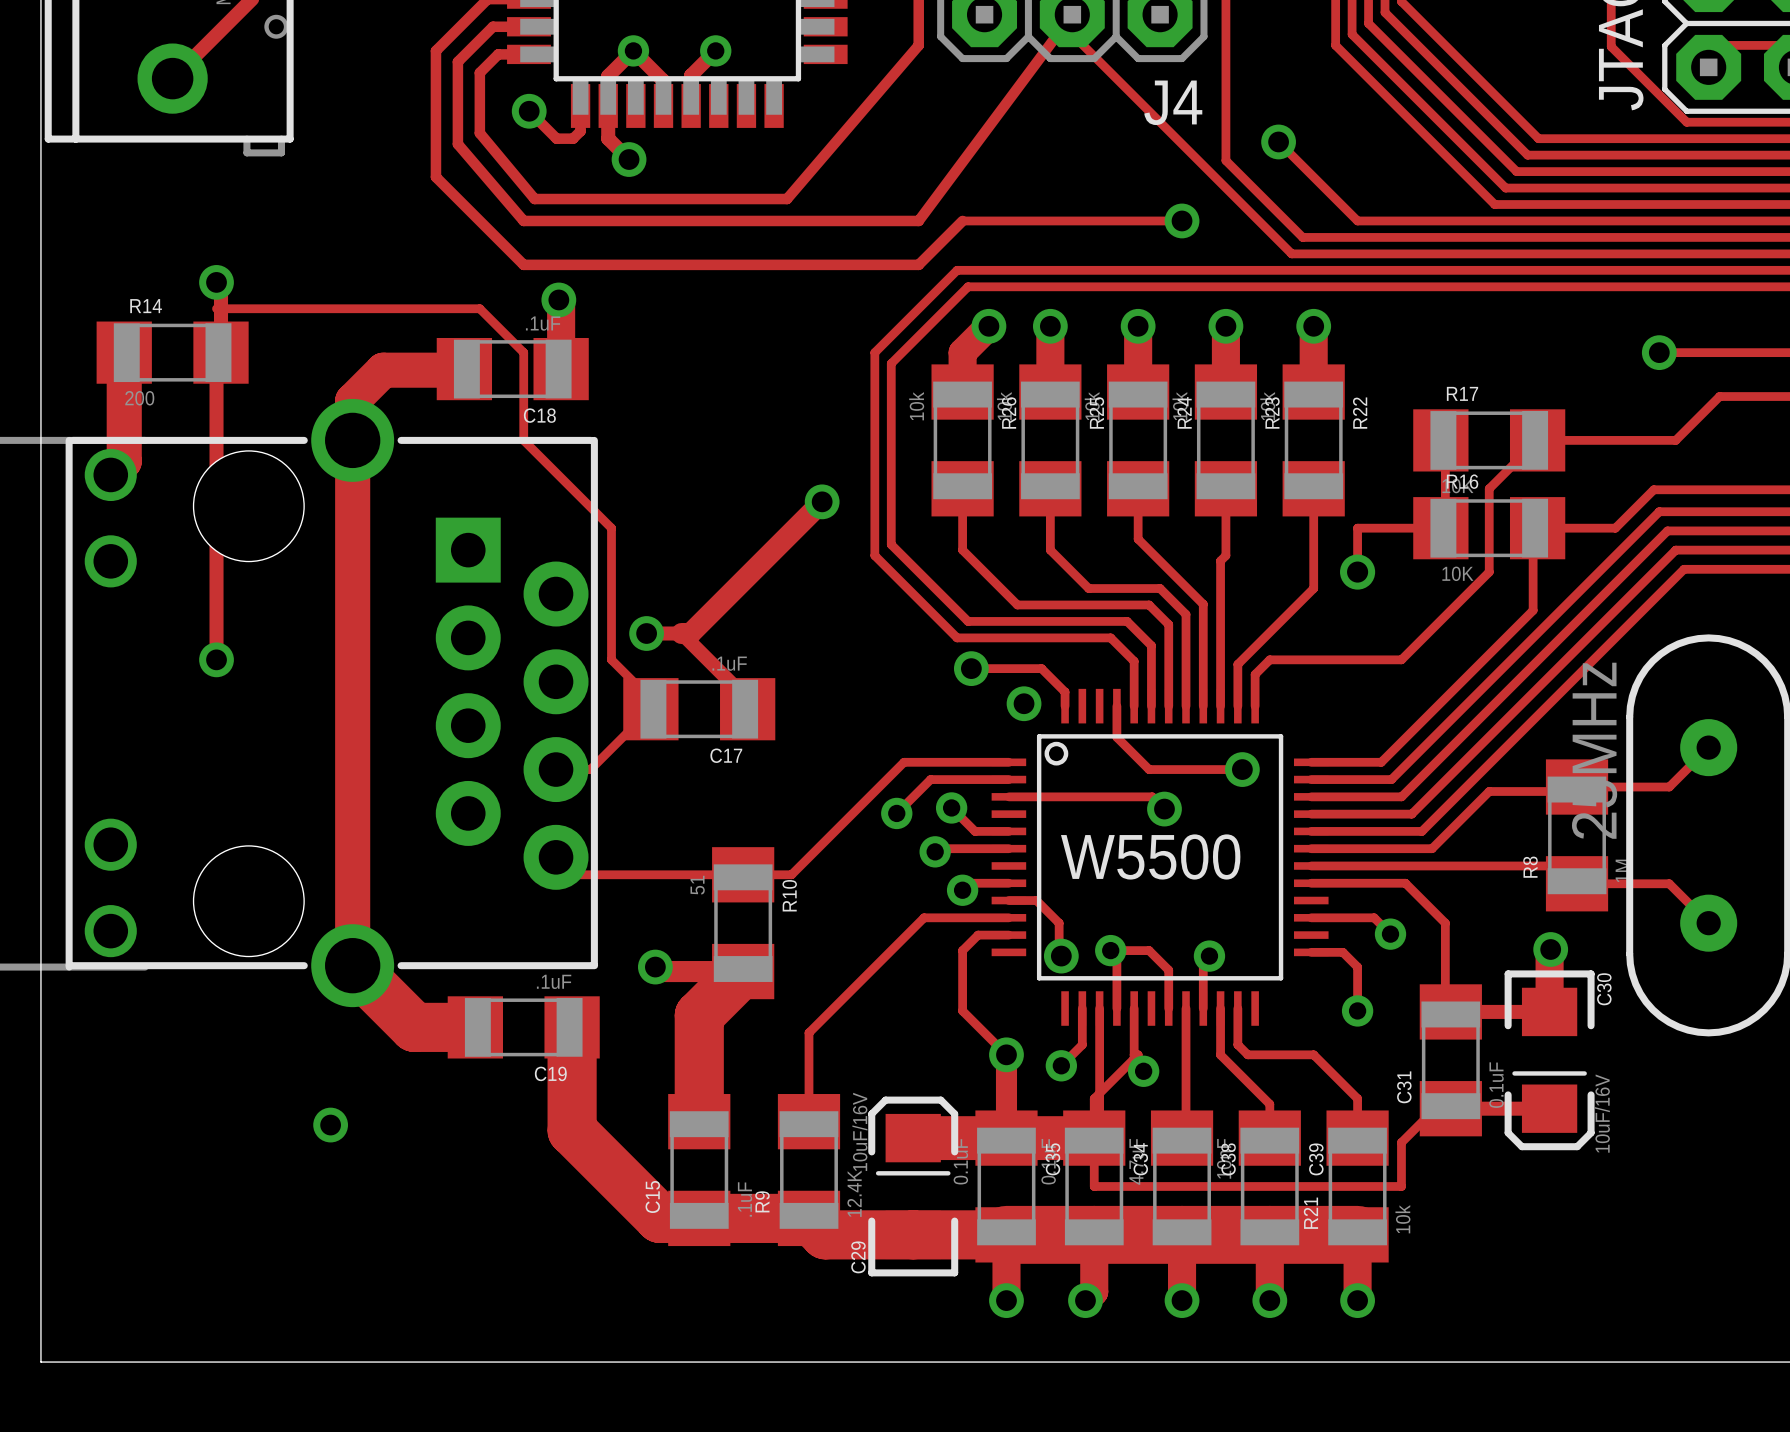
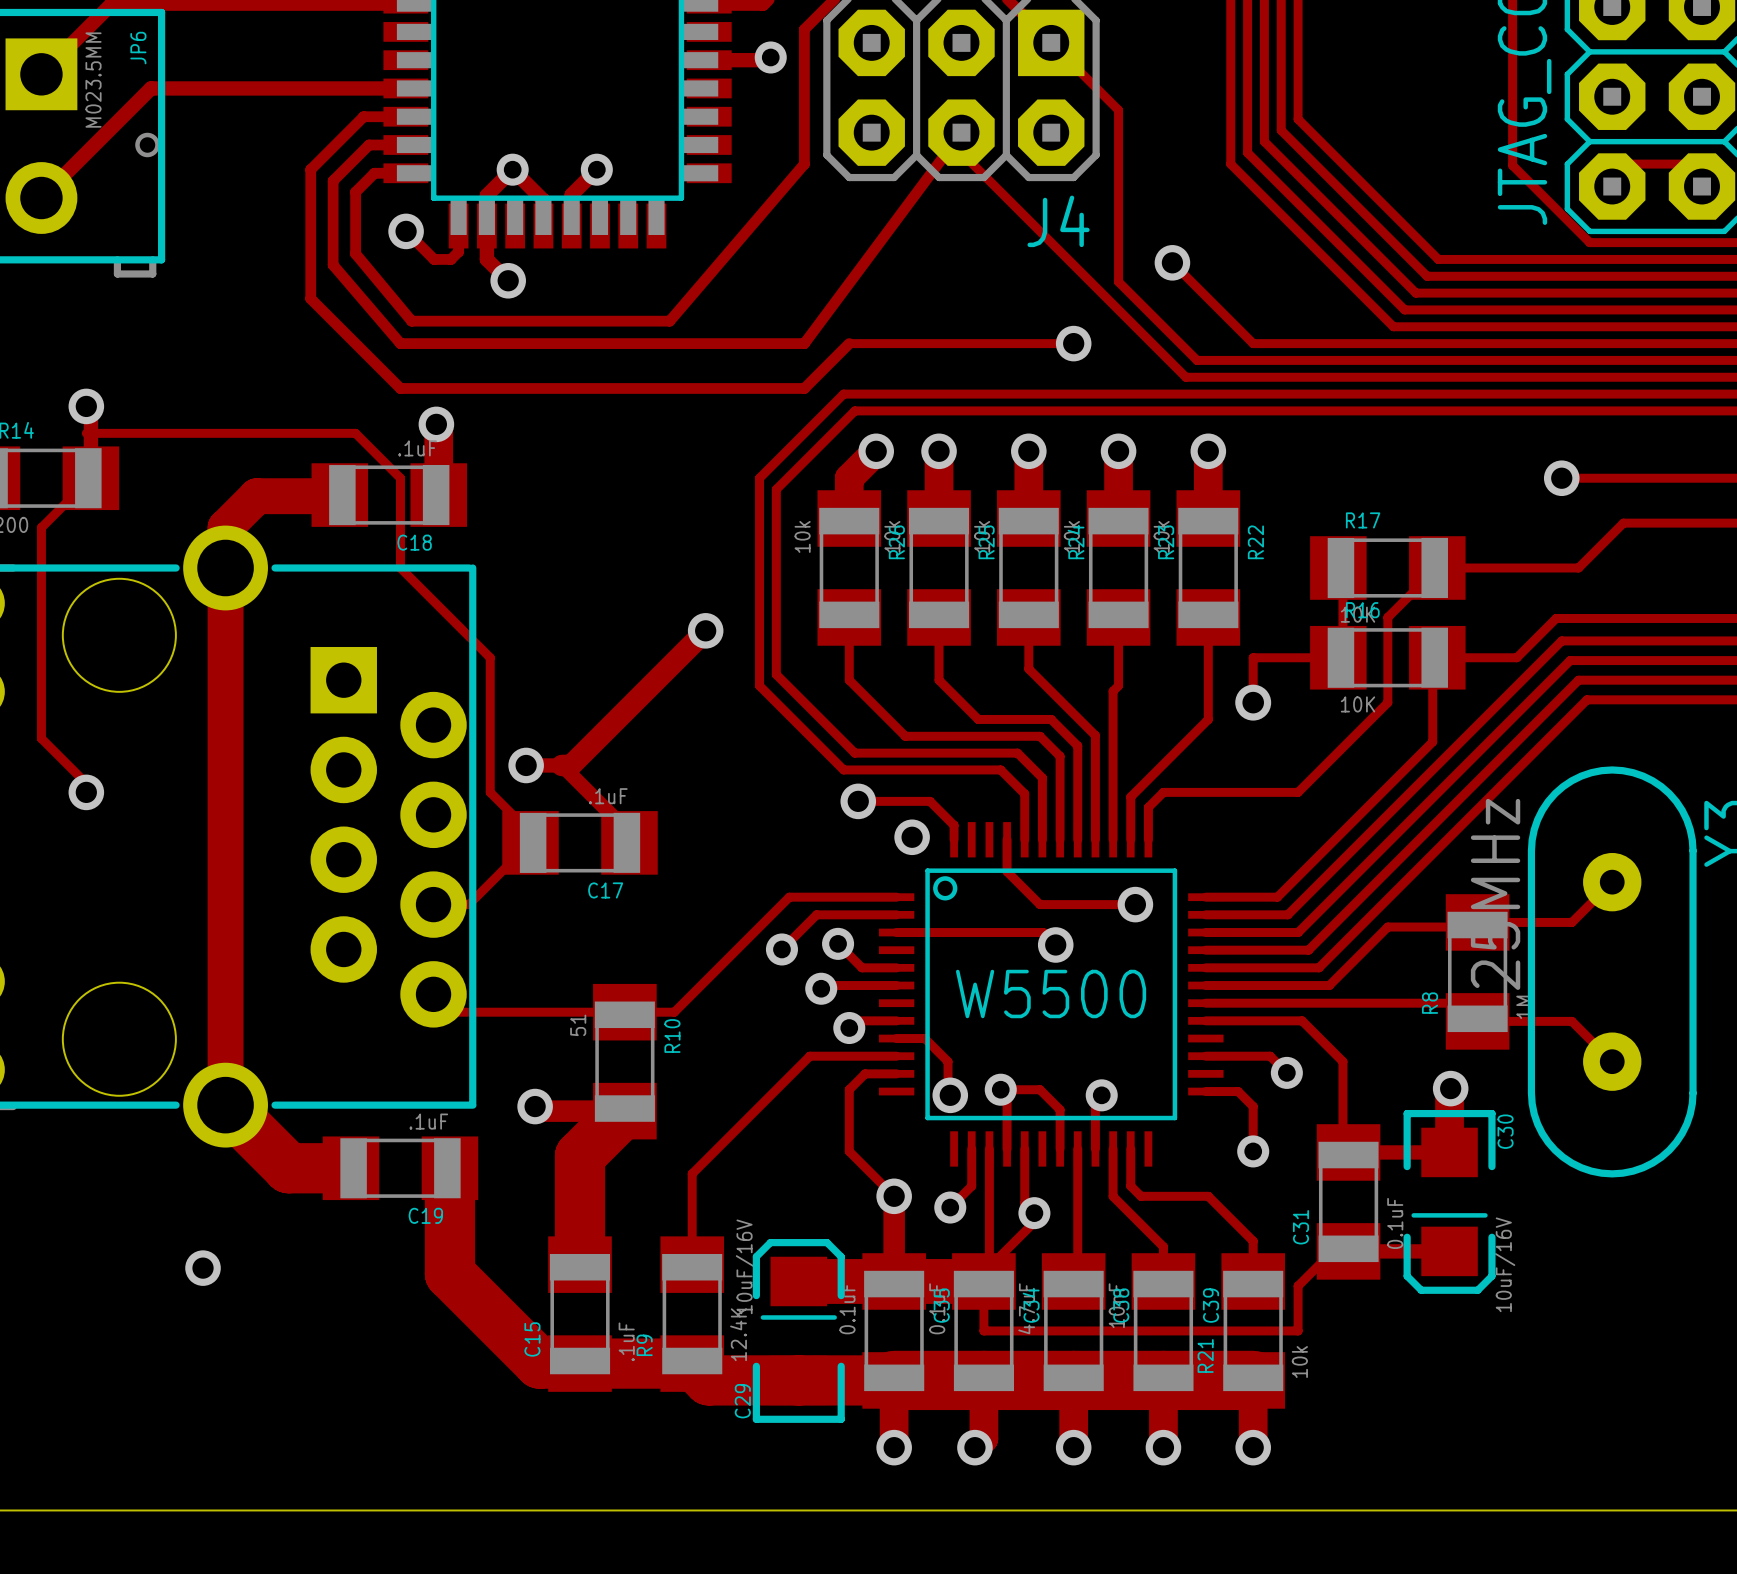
track: (216, 357) (216, 651) -> (90, 478) (41, 527) (41, 738) (86, 783)
track: (1134, 1054) (1138, 1054) (1094, 1098) (1094, 1138) -> none
track: none -> (1033, 1214) (1033, 1223) (988, 1268)

